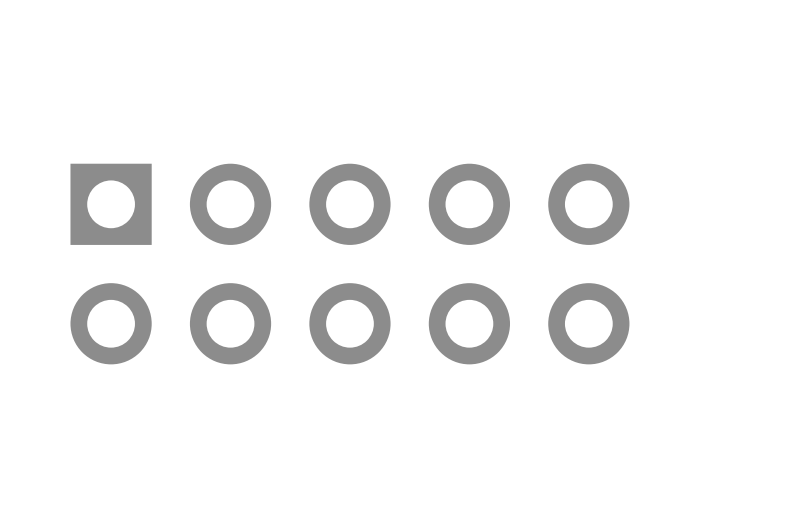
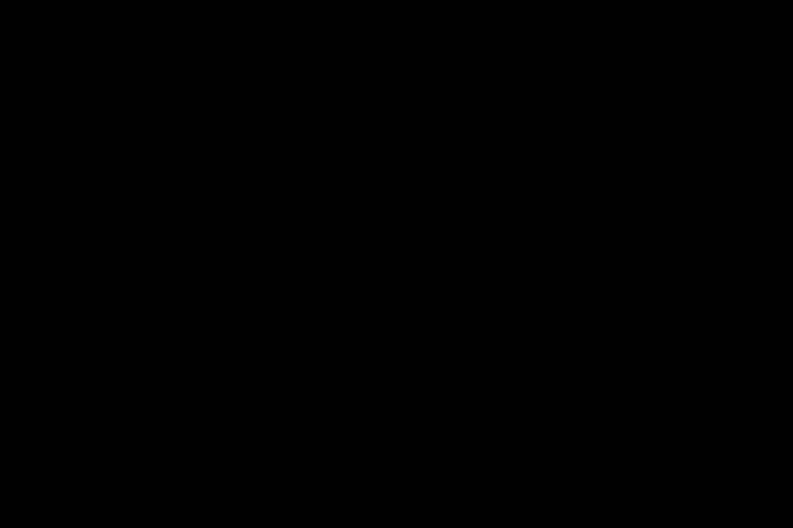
part: (349, 264) -> none

